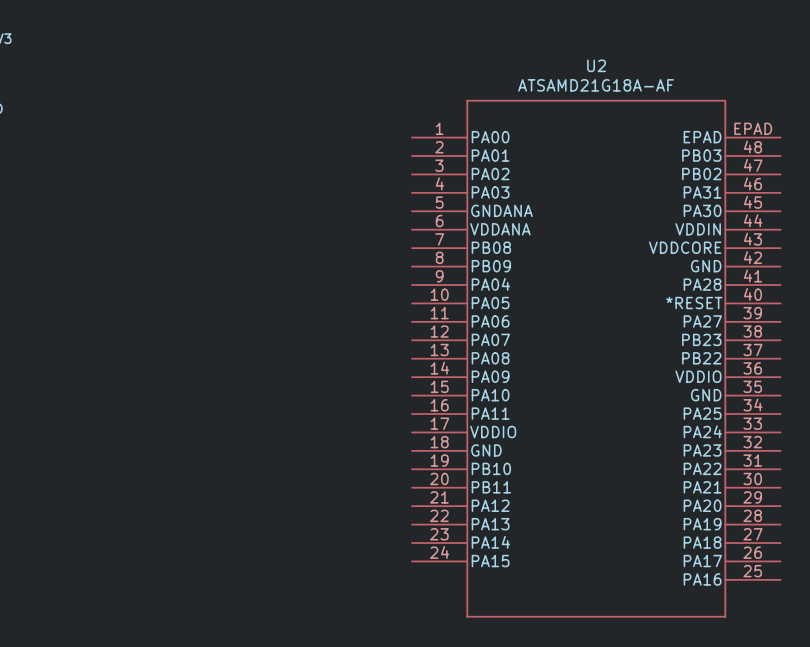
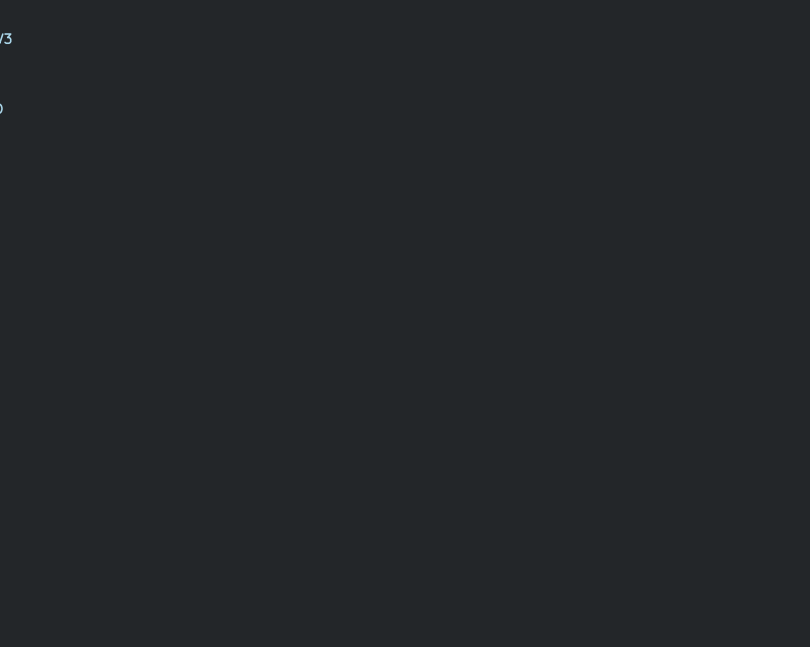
U2: ATSAMD21G18A-AF (596, 358) -> none

